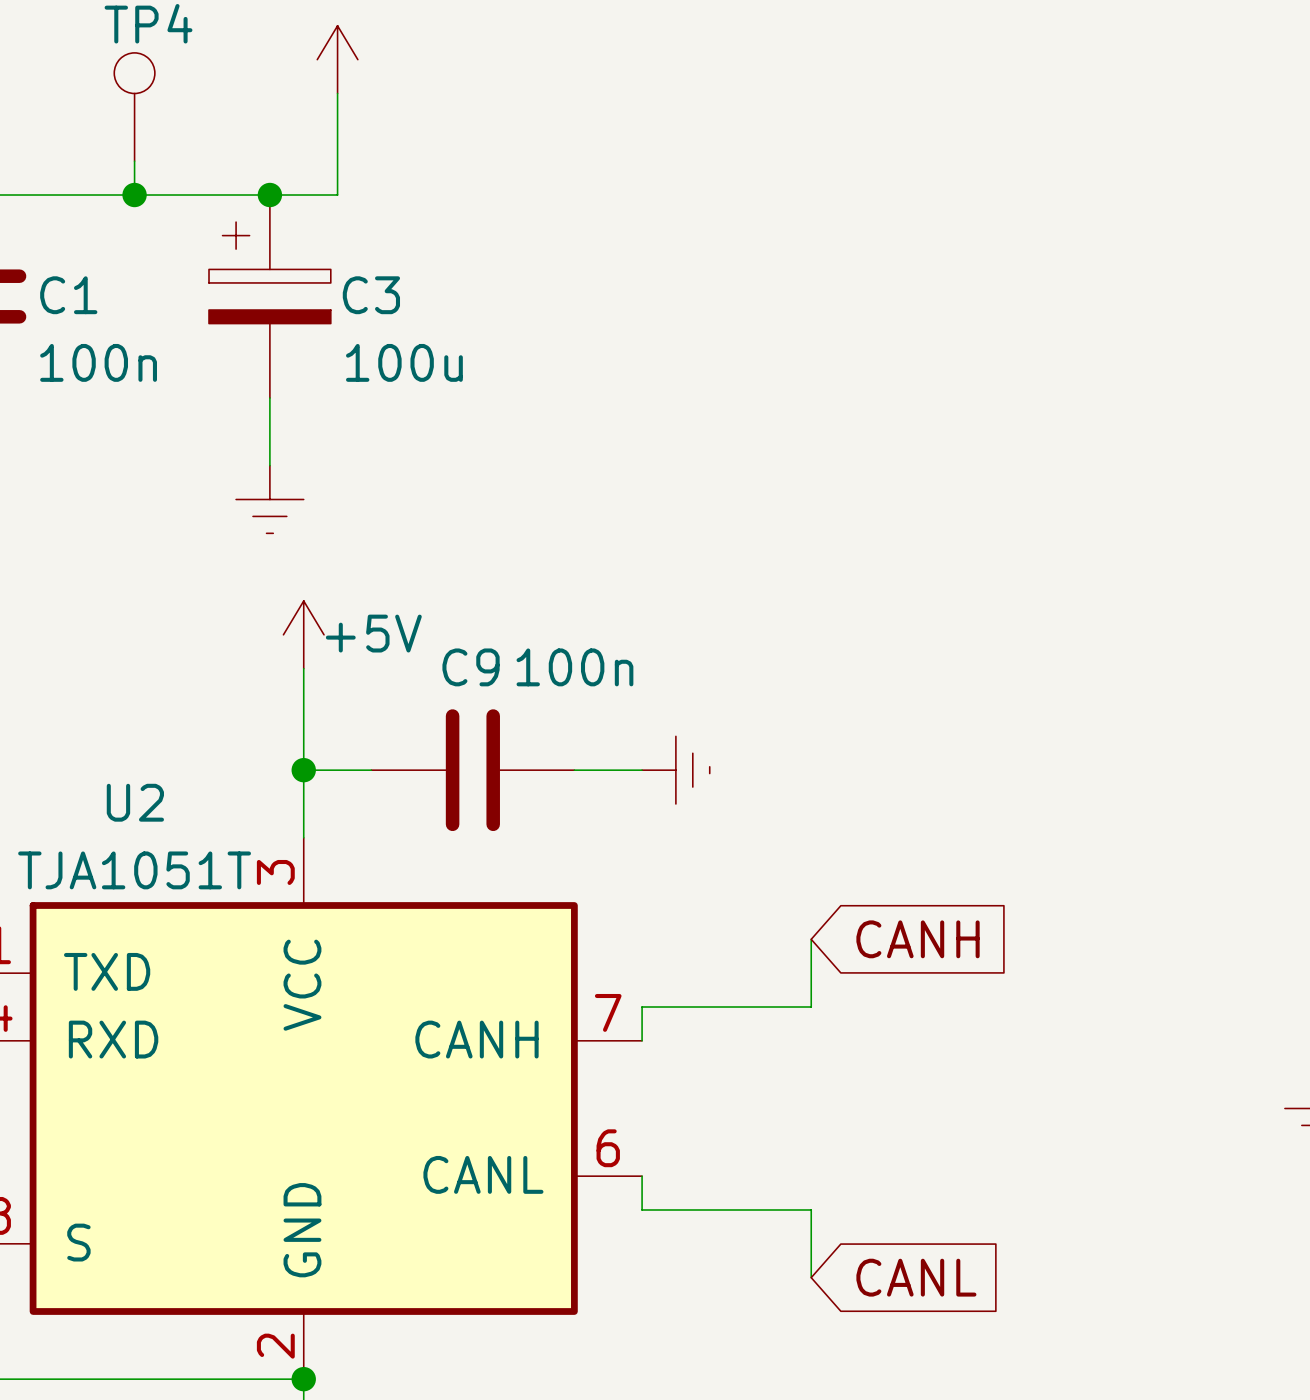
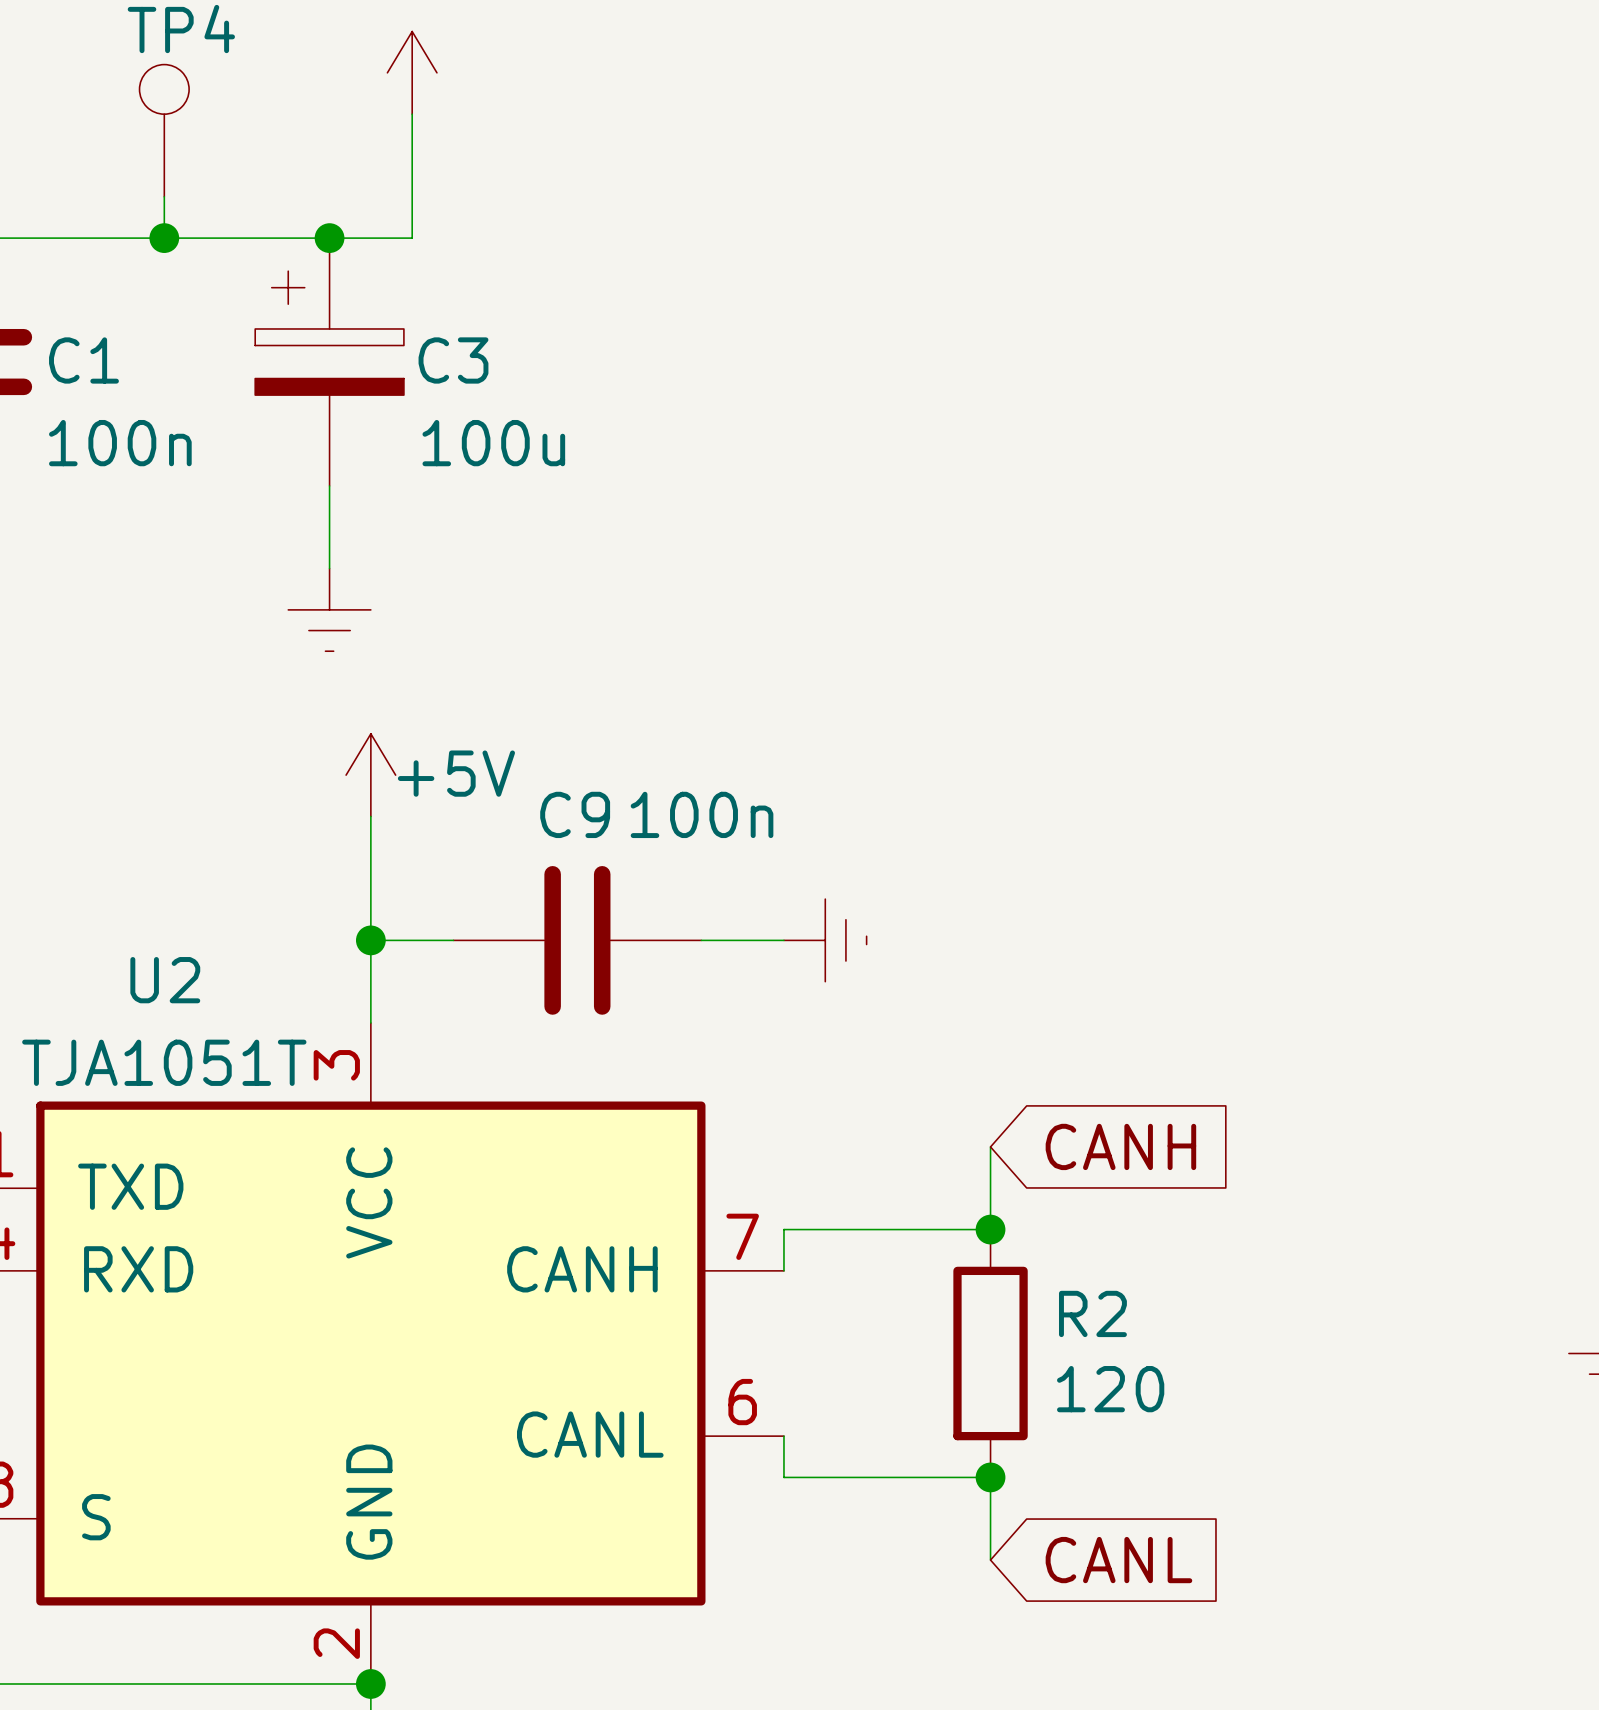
junction: none -> (990, 1229)
R2: none -> 120 (990, 1353)
junction: none -> (990, 1477)

